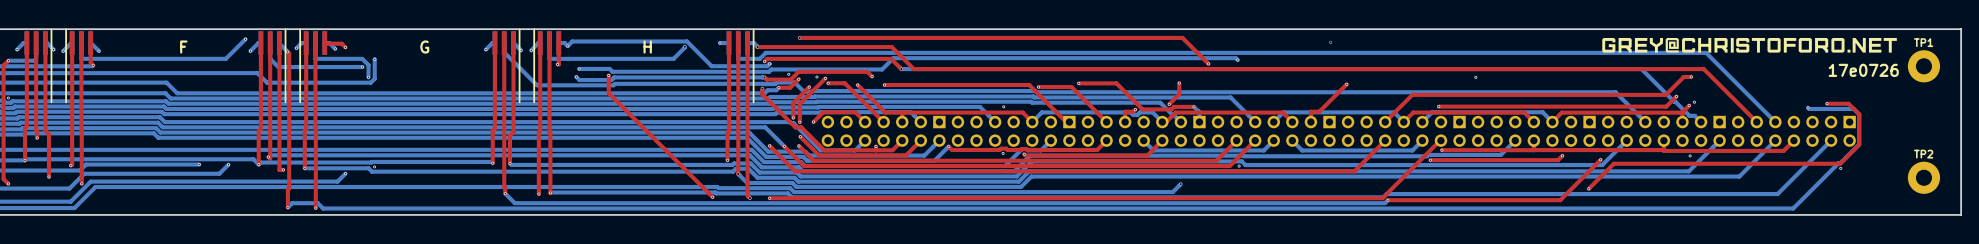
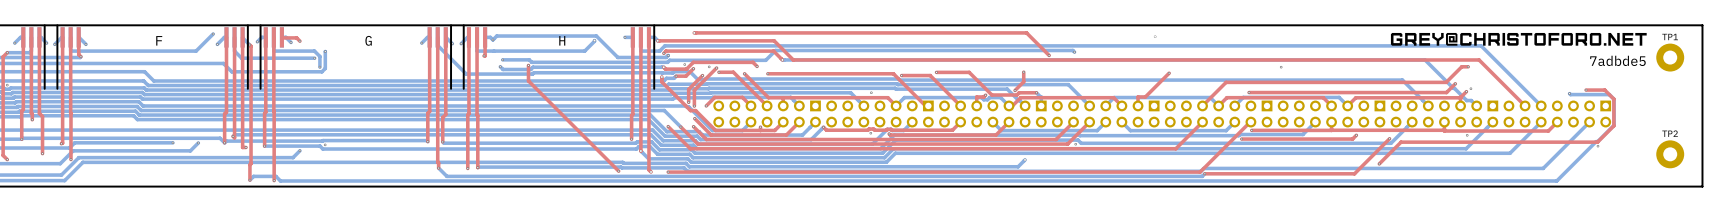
text: 17e0726 (1863, 70) -> 7adbde5 (1617, 60)

